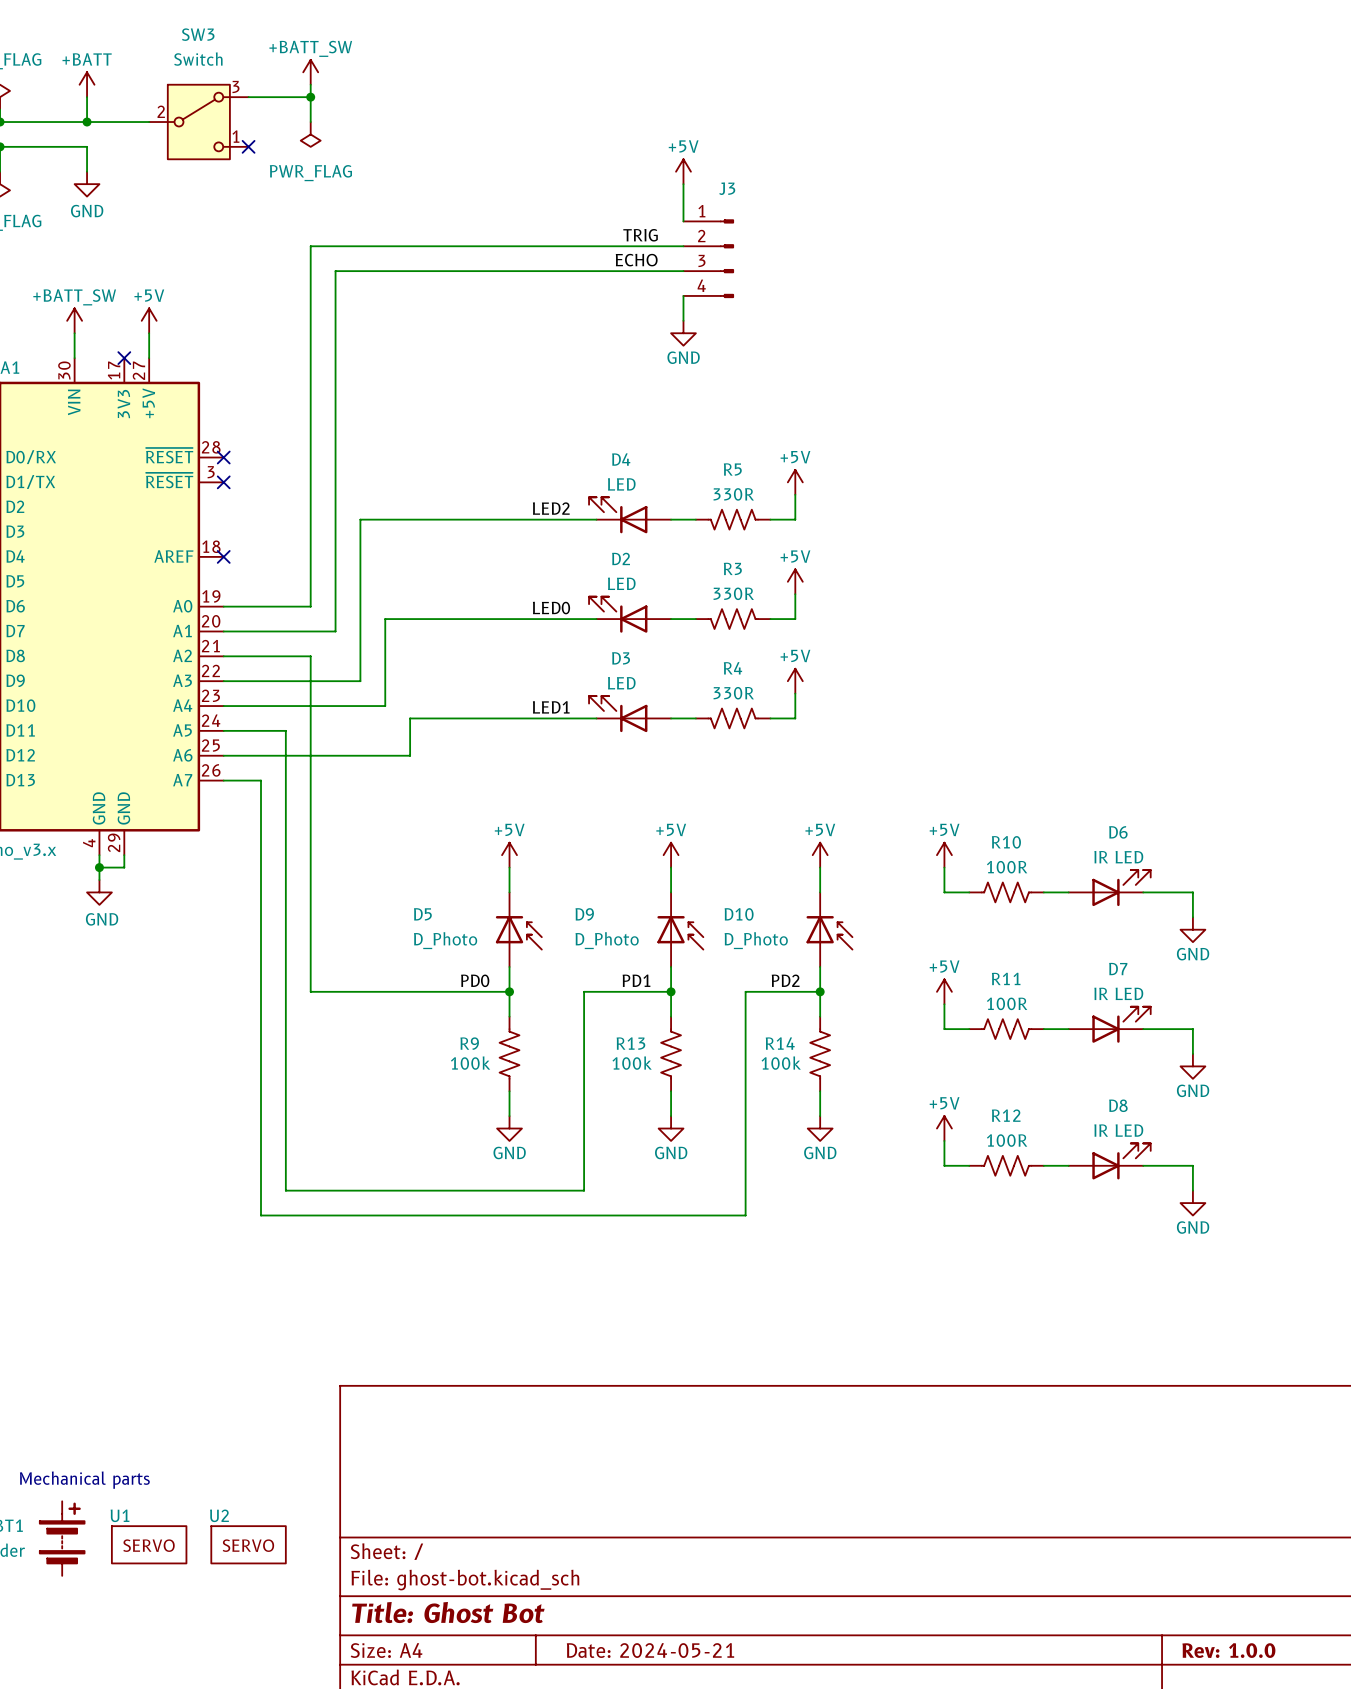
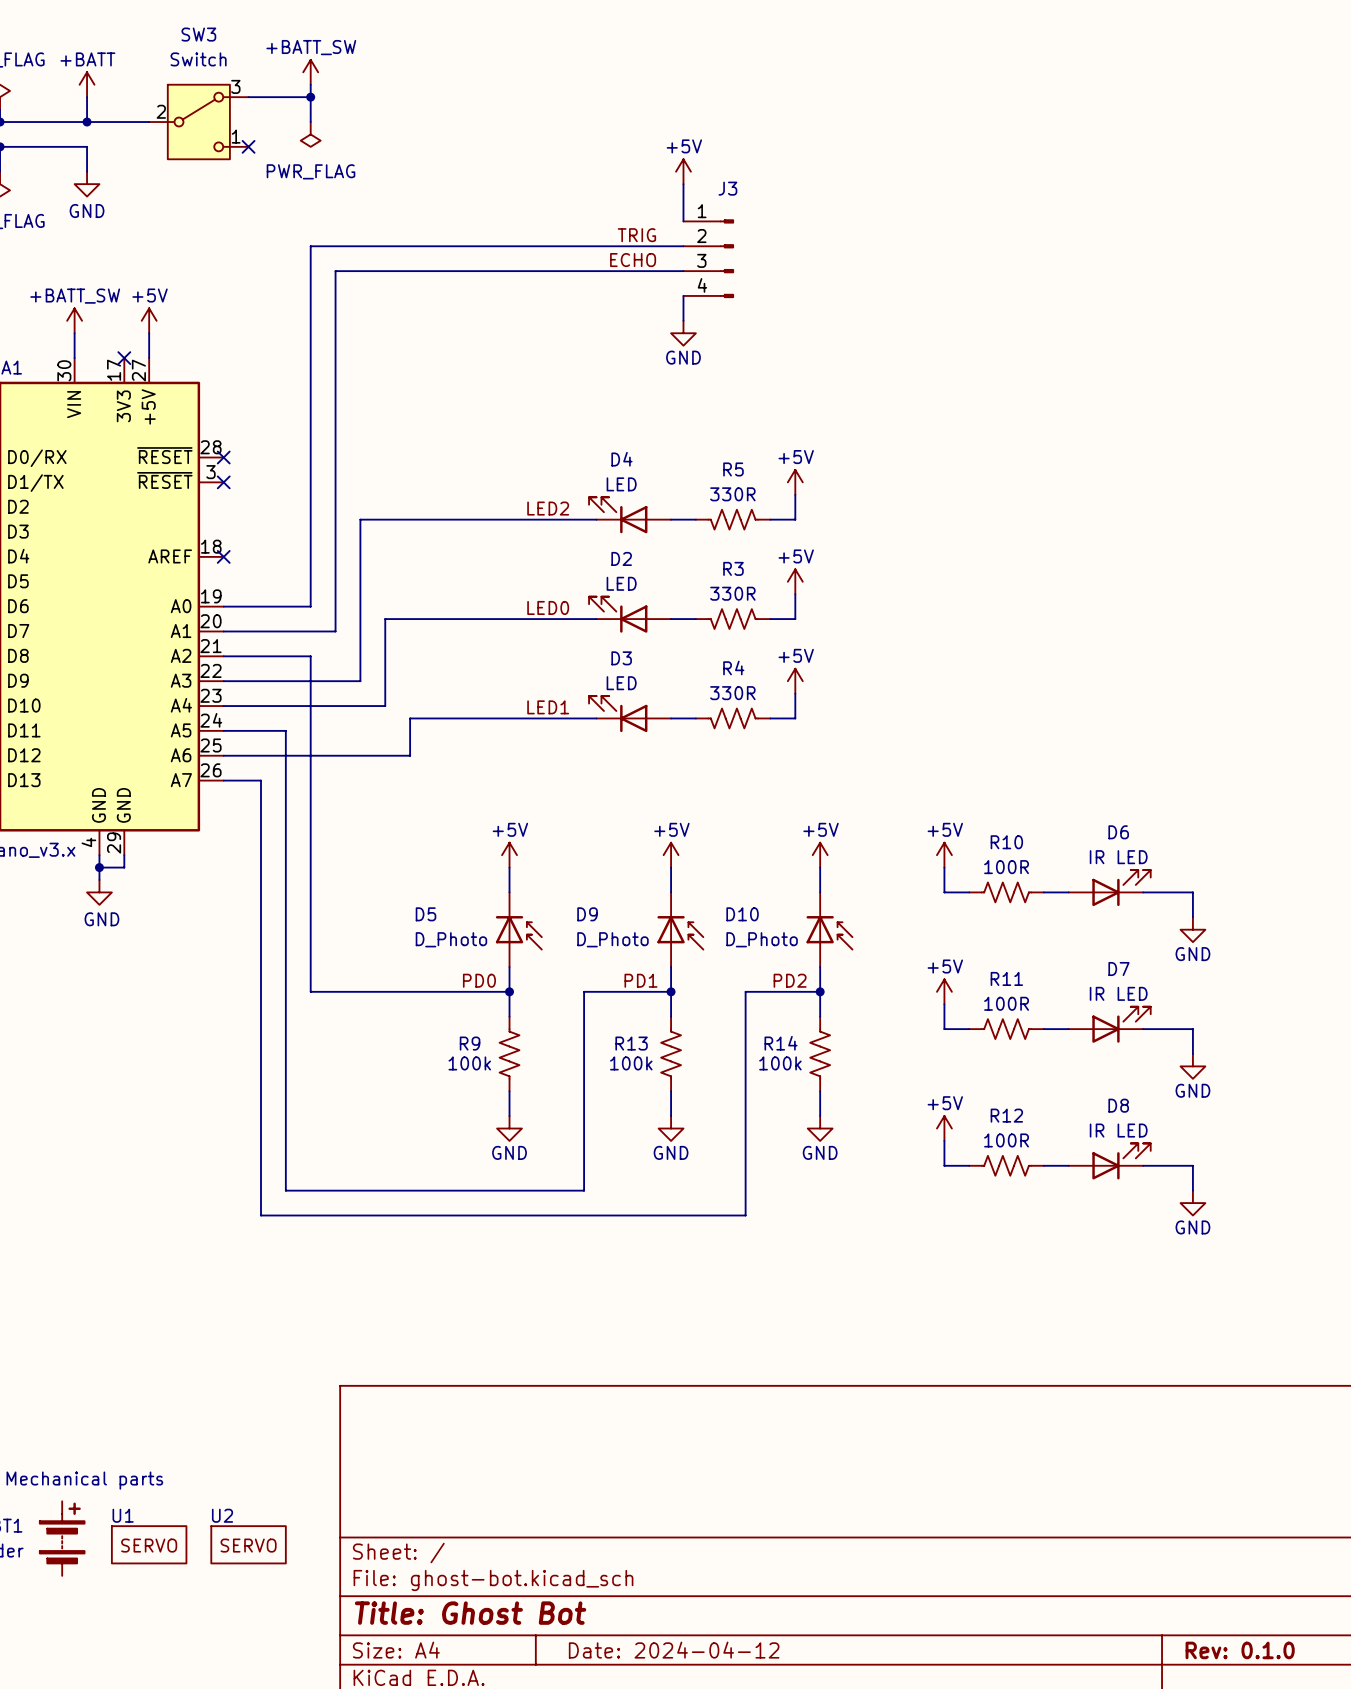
title block: Date: 2024-05-21 (650, 1650) -> Date: 2024-04-12 (674, 1650)
title block: Rev: 1.0.0 (1228, 1650) -> Rev: 0.1.0 (1240, 1650)

